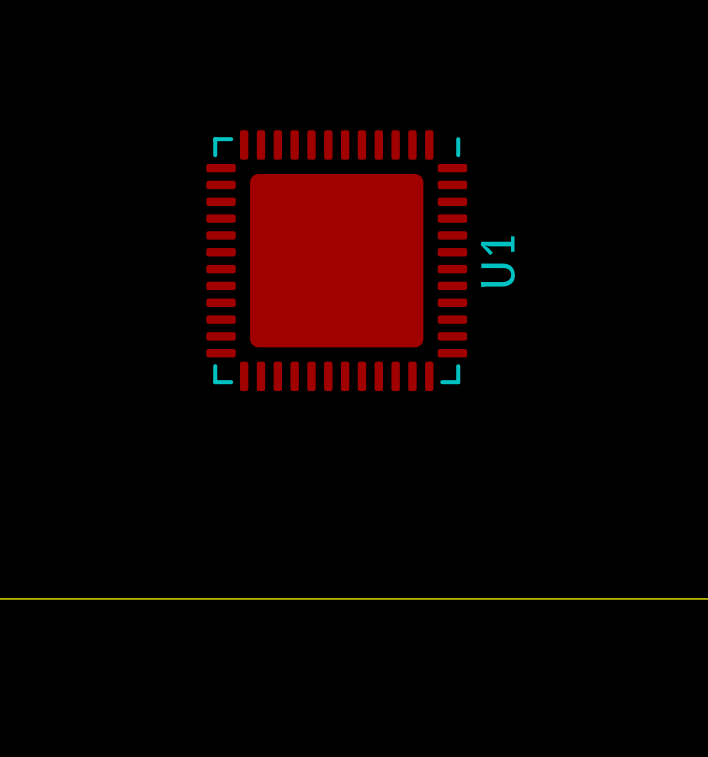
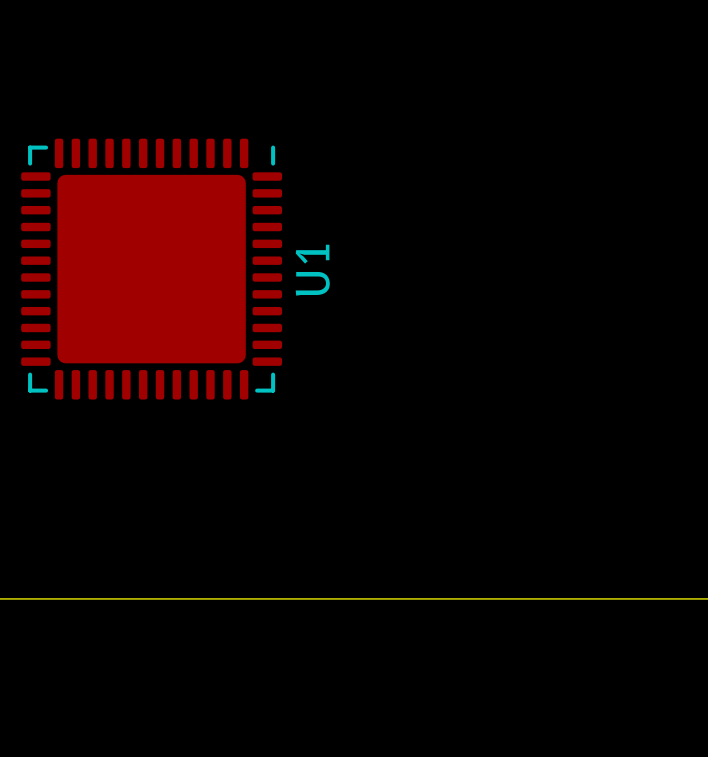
U1 footprint: [206, 130, 468, 392] -> [21, 138, 283, 400]

